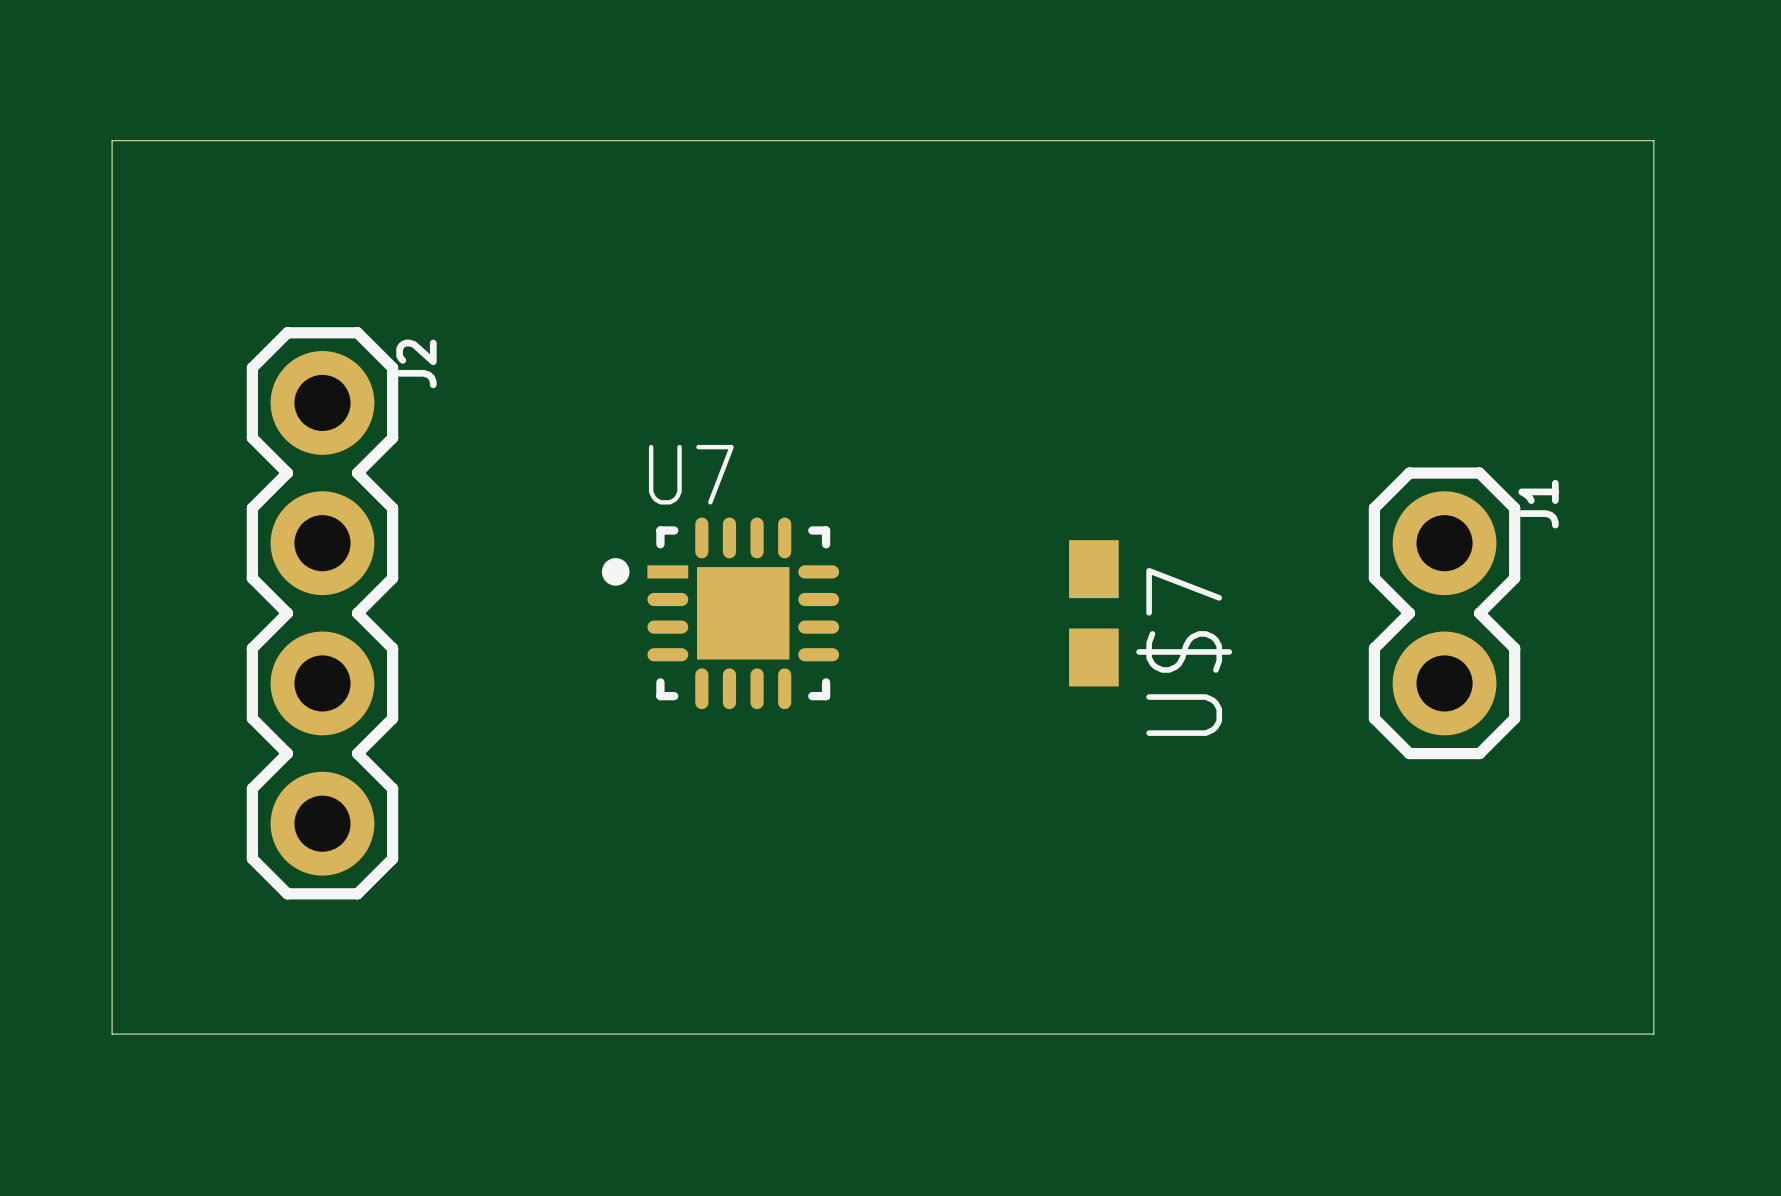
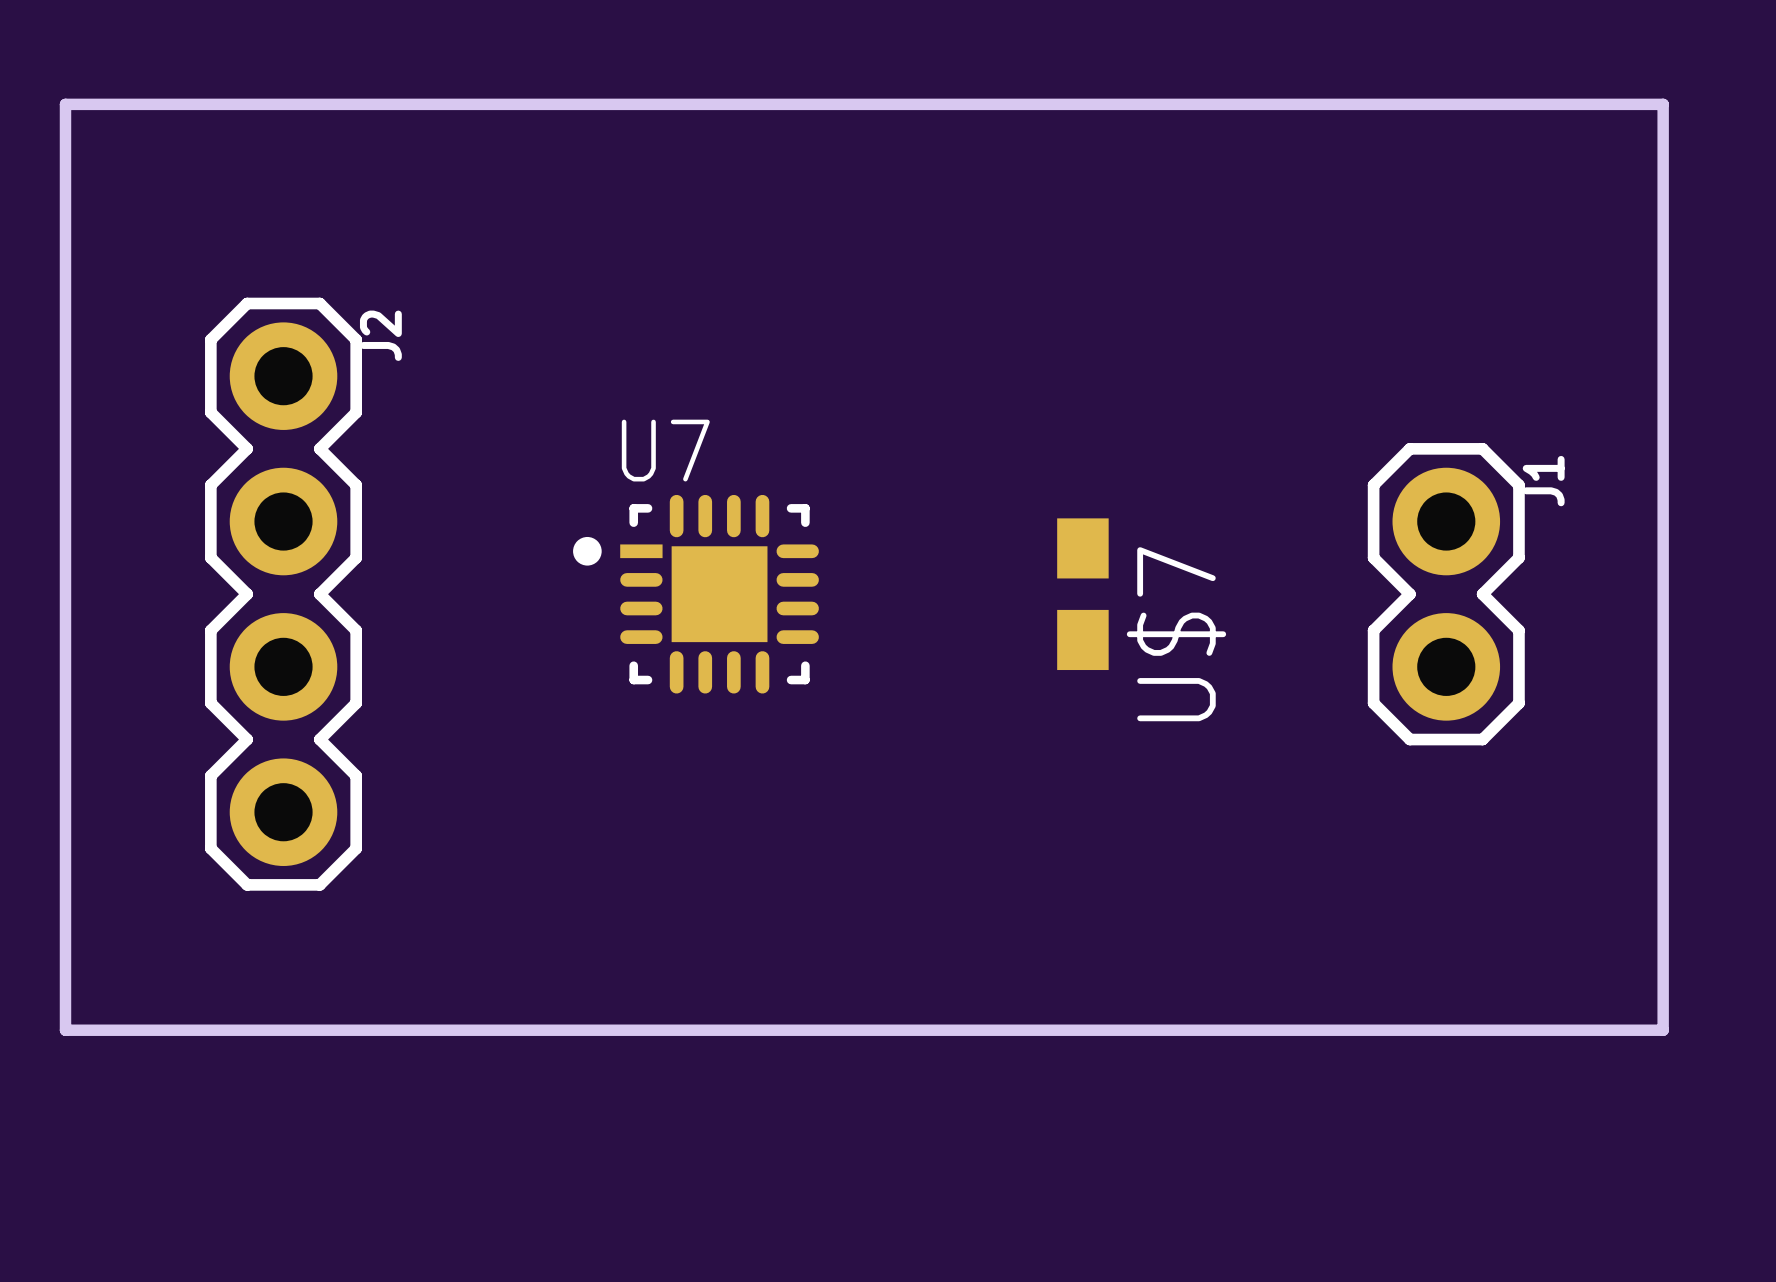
board edge width: thin (112, 140) (1653, 140) (1653, 1034) (112, 1034) (112, 140) -> thick (65, 104) (1663, 104) (1663, 1030) (65, 1030) (65, 104)

